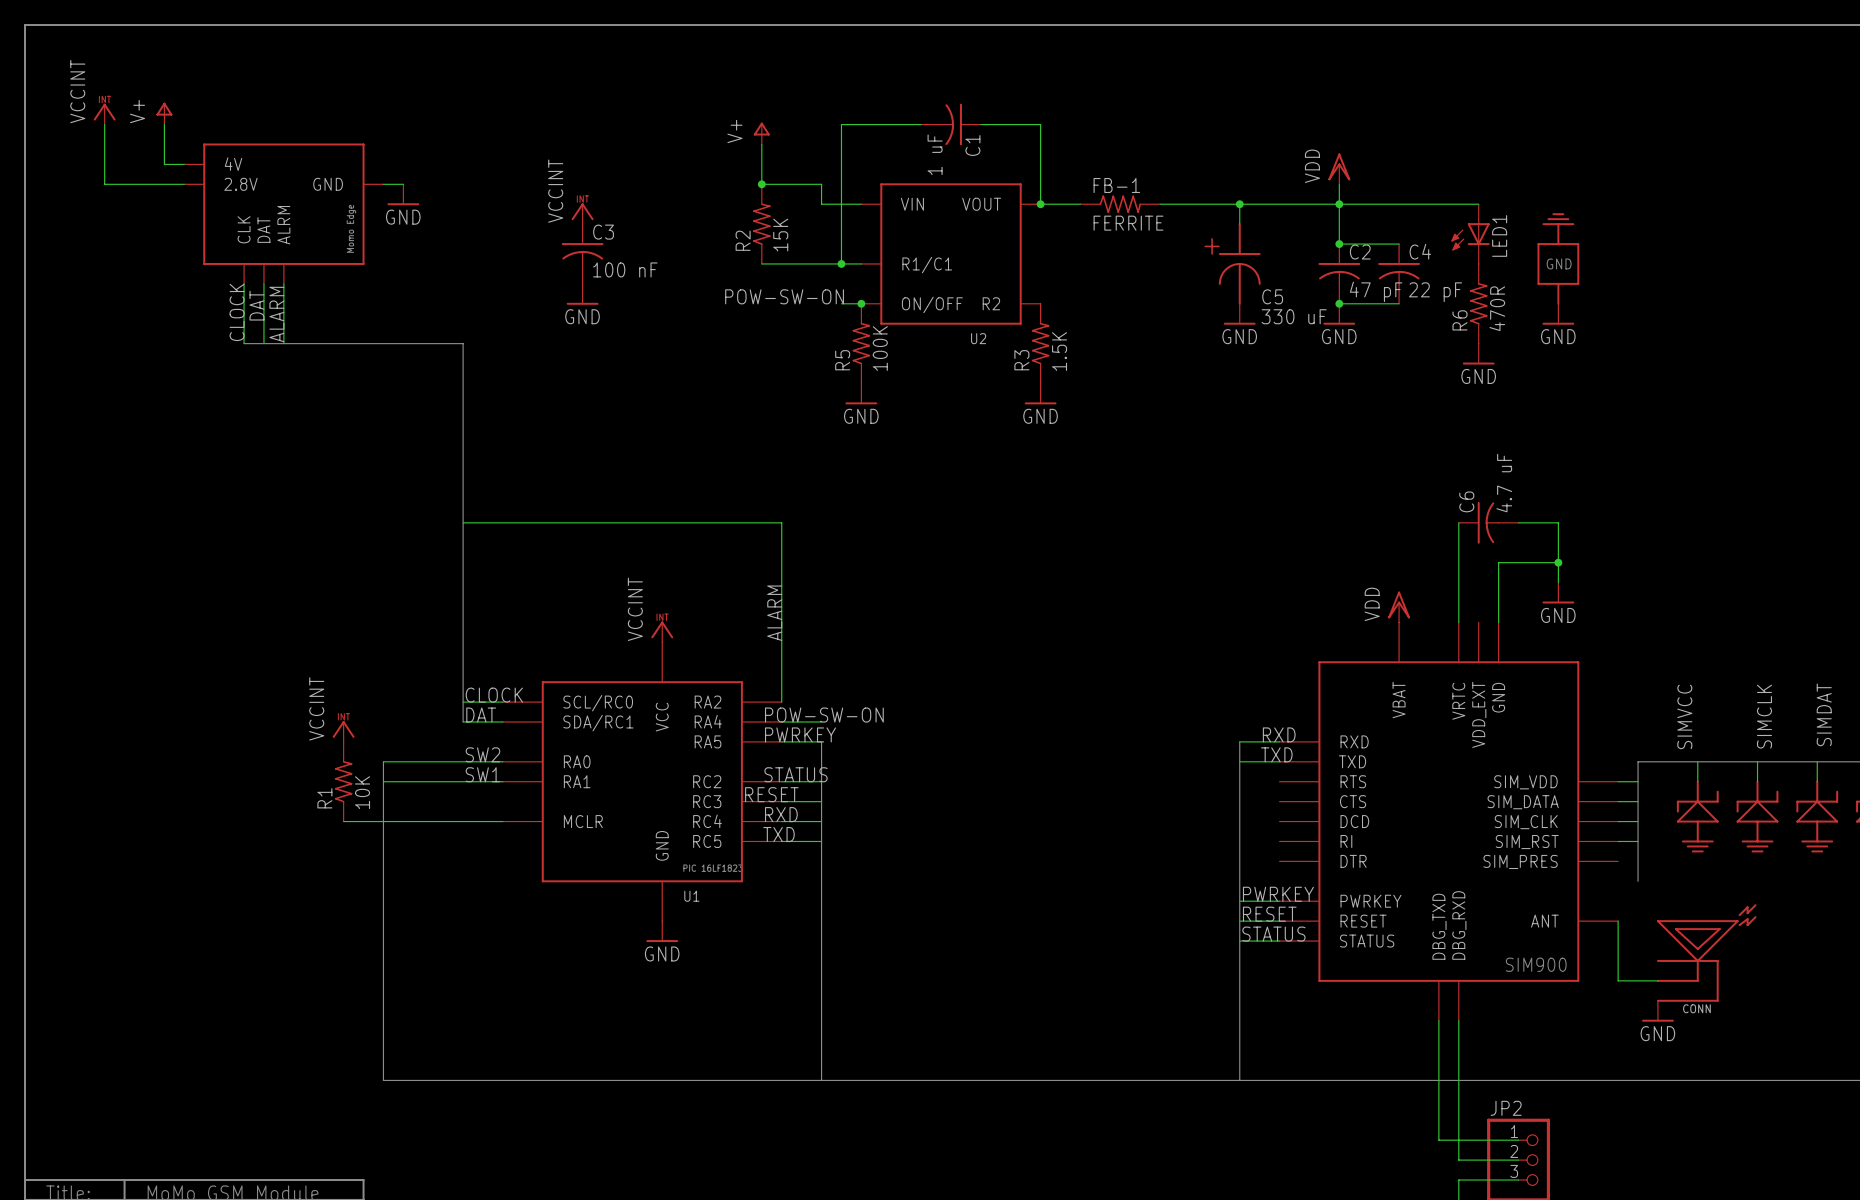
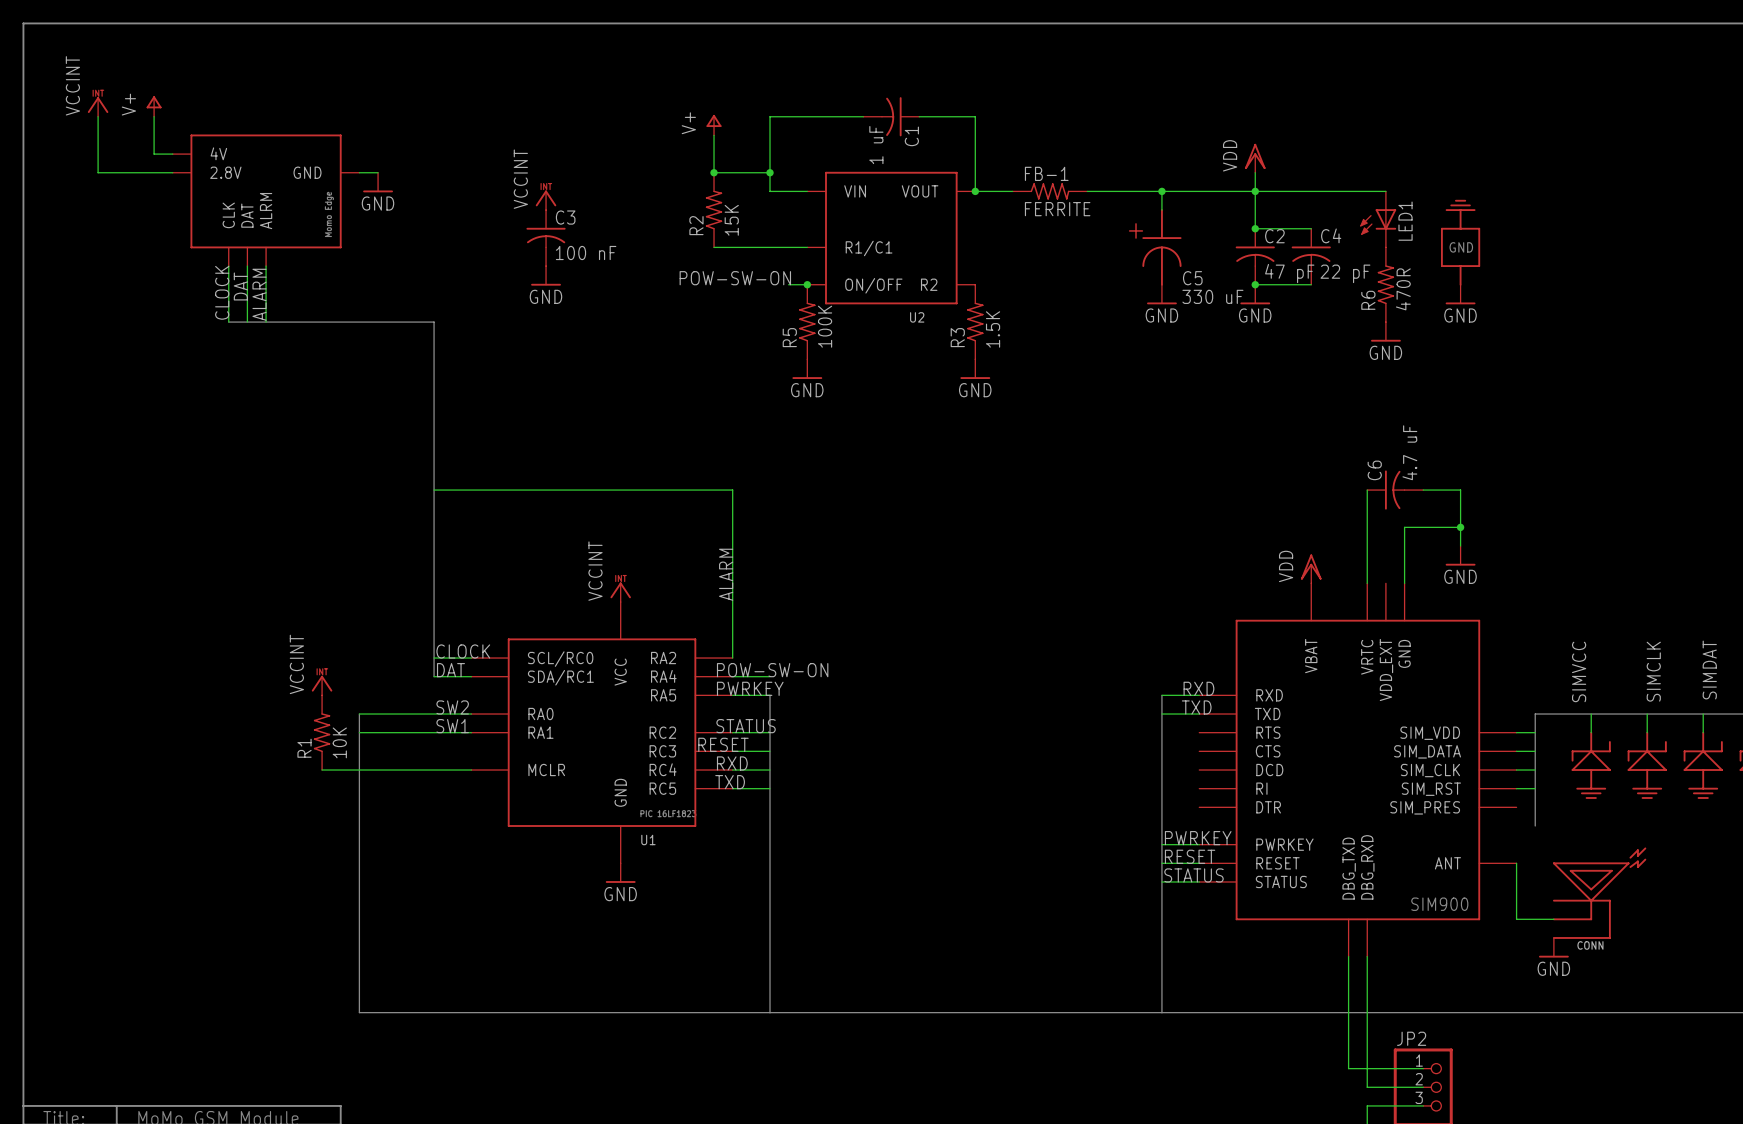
wire: (841, 124) (841, 263) -> (788, 116) (770, 116) (770, 172)
junction: none -> (770, 172)
junction: (841, 263) -> none

